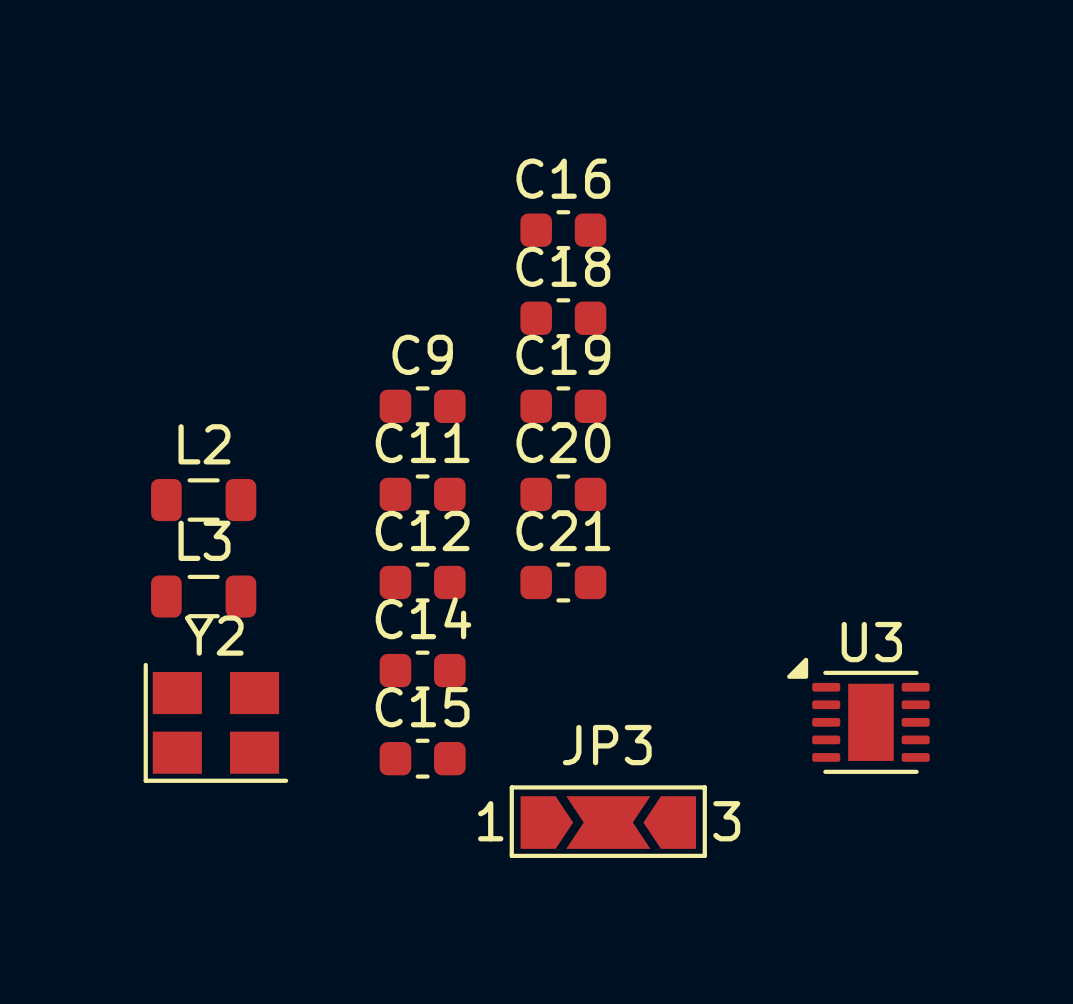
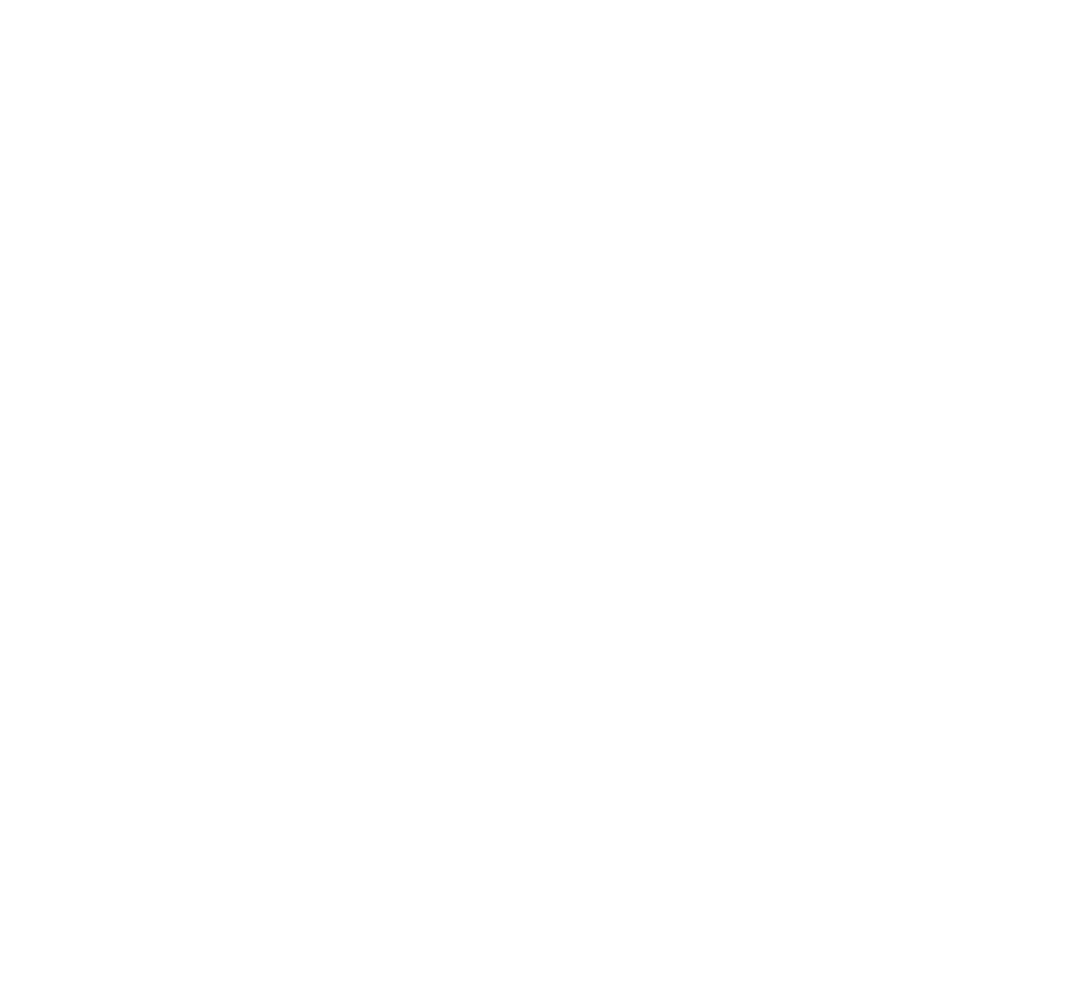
C16: (563, 230) -> none
C18: (563, 318) -> none
C9: (422, 406) -> none
C19: (563, 406) -> none
C11: (422, 494) -> none
C20: (563, 494) -> none
L2: (203, 500) -> none
C12: (422, 582) -> none
C21: (563, 582) -> none
L3: (203, 596) -> none
C14: (422, 670) -> none
U3: (858, 715) -> none
Y2: (215, 722) -> none
C15: (422, 758) -> none
JP3: (608, 821) -> none

